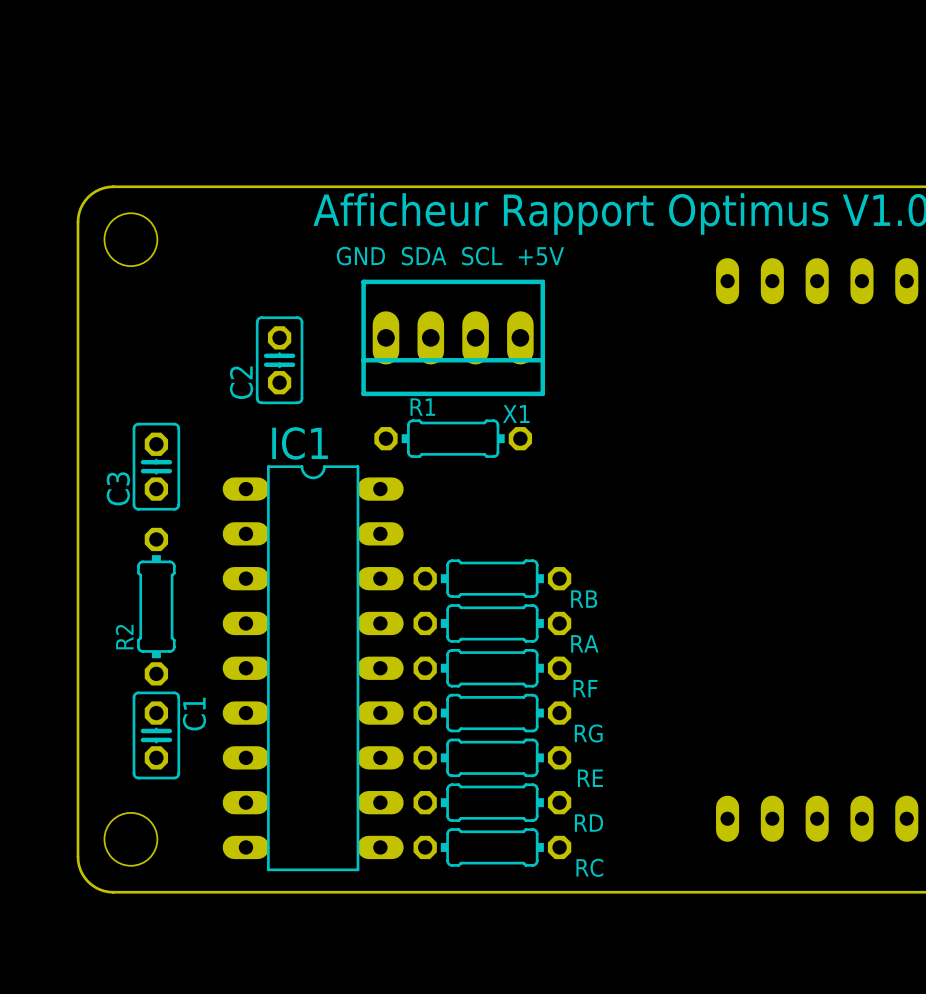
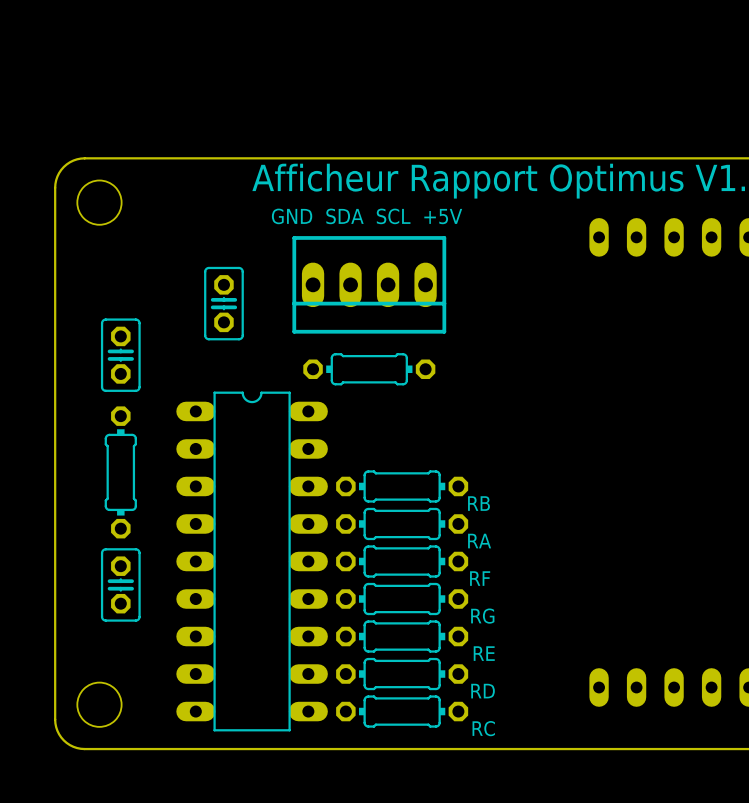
C2 name: C2 (241, 382) -> none
R1 name: R1 (422, 407) -> none
X1 name: X1 (516, 414) -> none
part: none -> (120, 355)
IC1 name: IC1 (300, 443) -> none
C3: (156, 466) -> none
part: none -> (120, 472)
R2: (156, 606) -> none
part: none -> (120, 584)
C1: (156, 735) -> none

